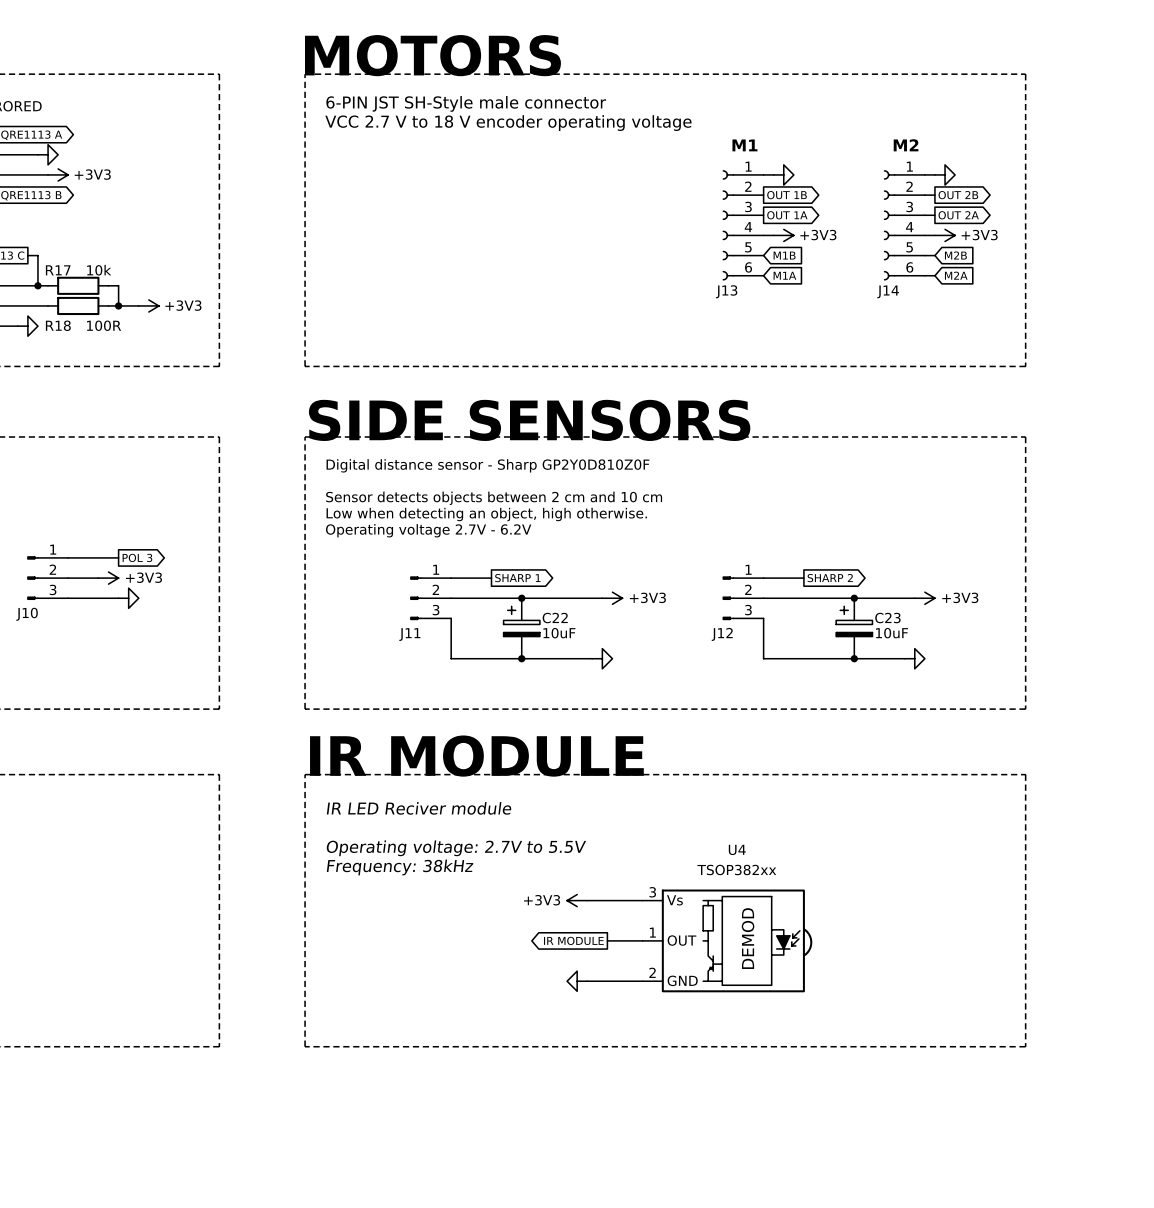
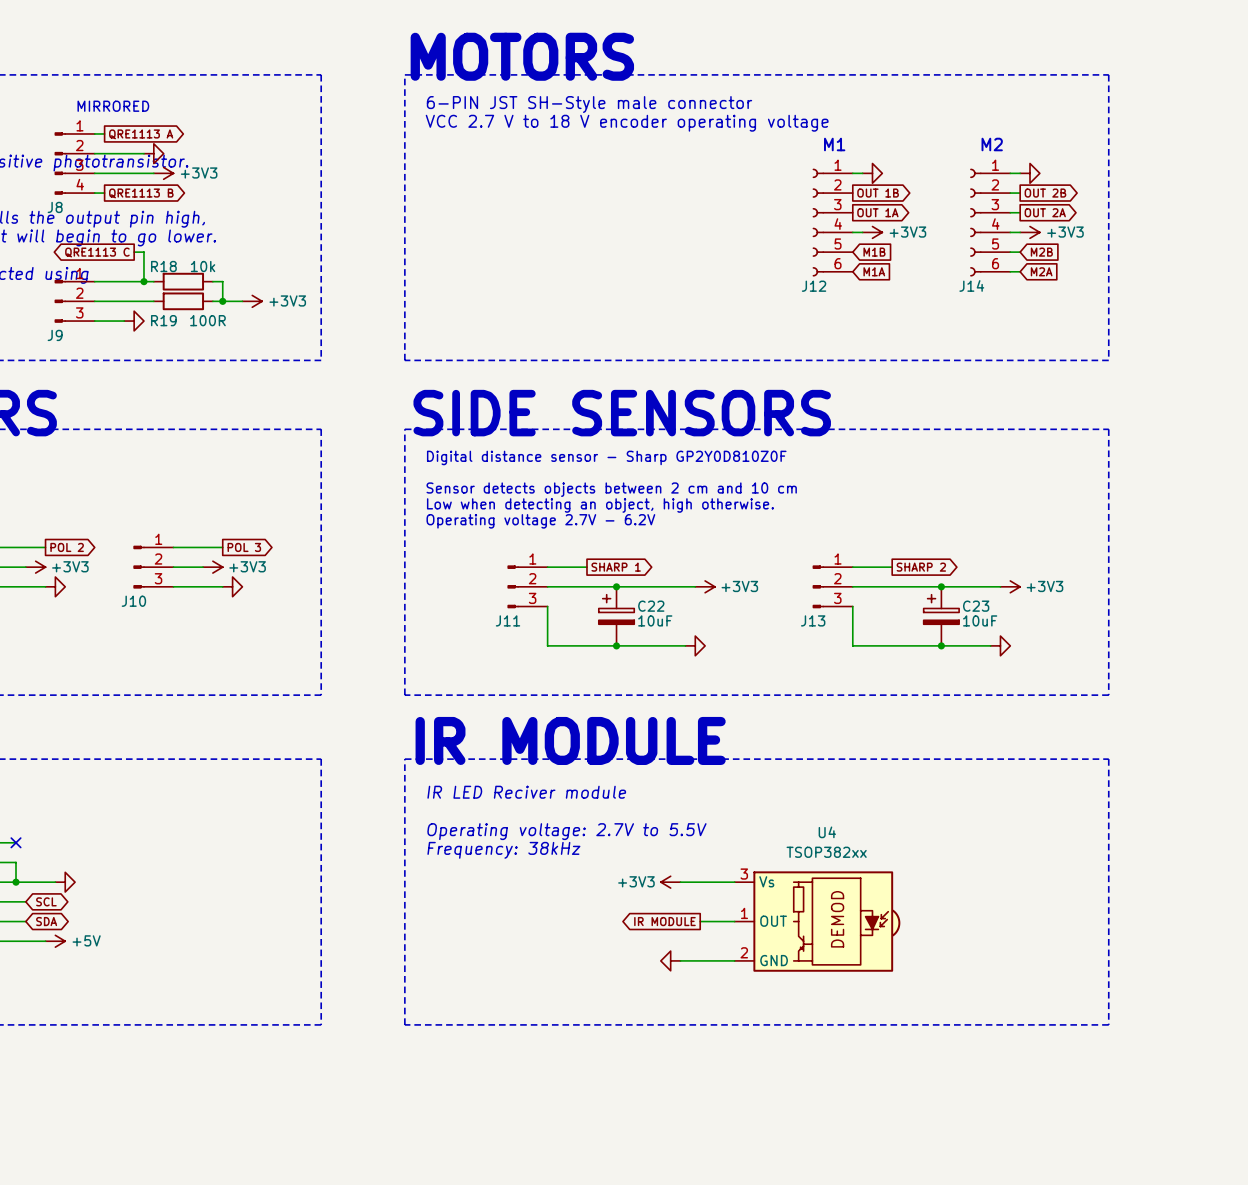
R17 name: R17 (58, 270) -> R18 (163, 266)
J13 name: J13 (726, 291) -> J12 (814, 286)
R18 name: R18 (58, 325) -> R19 (163, 320)
J12 name: J12 (722, 634) -> J13 (813, 620)

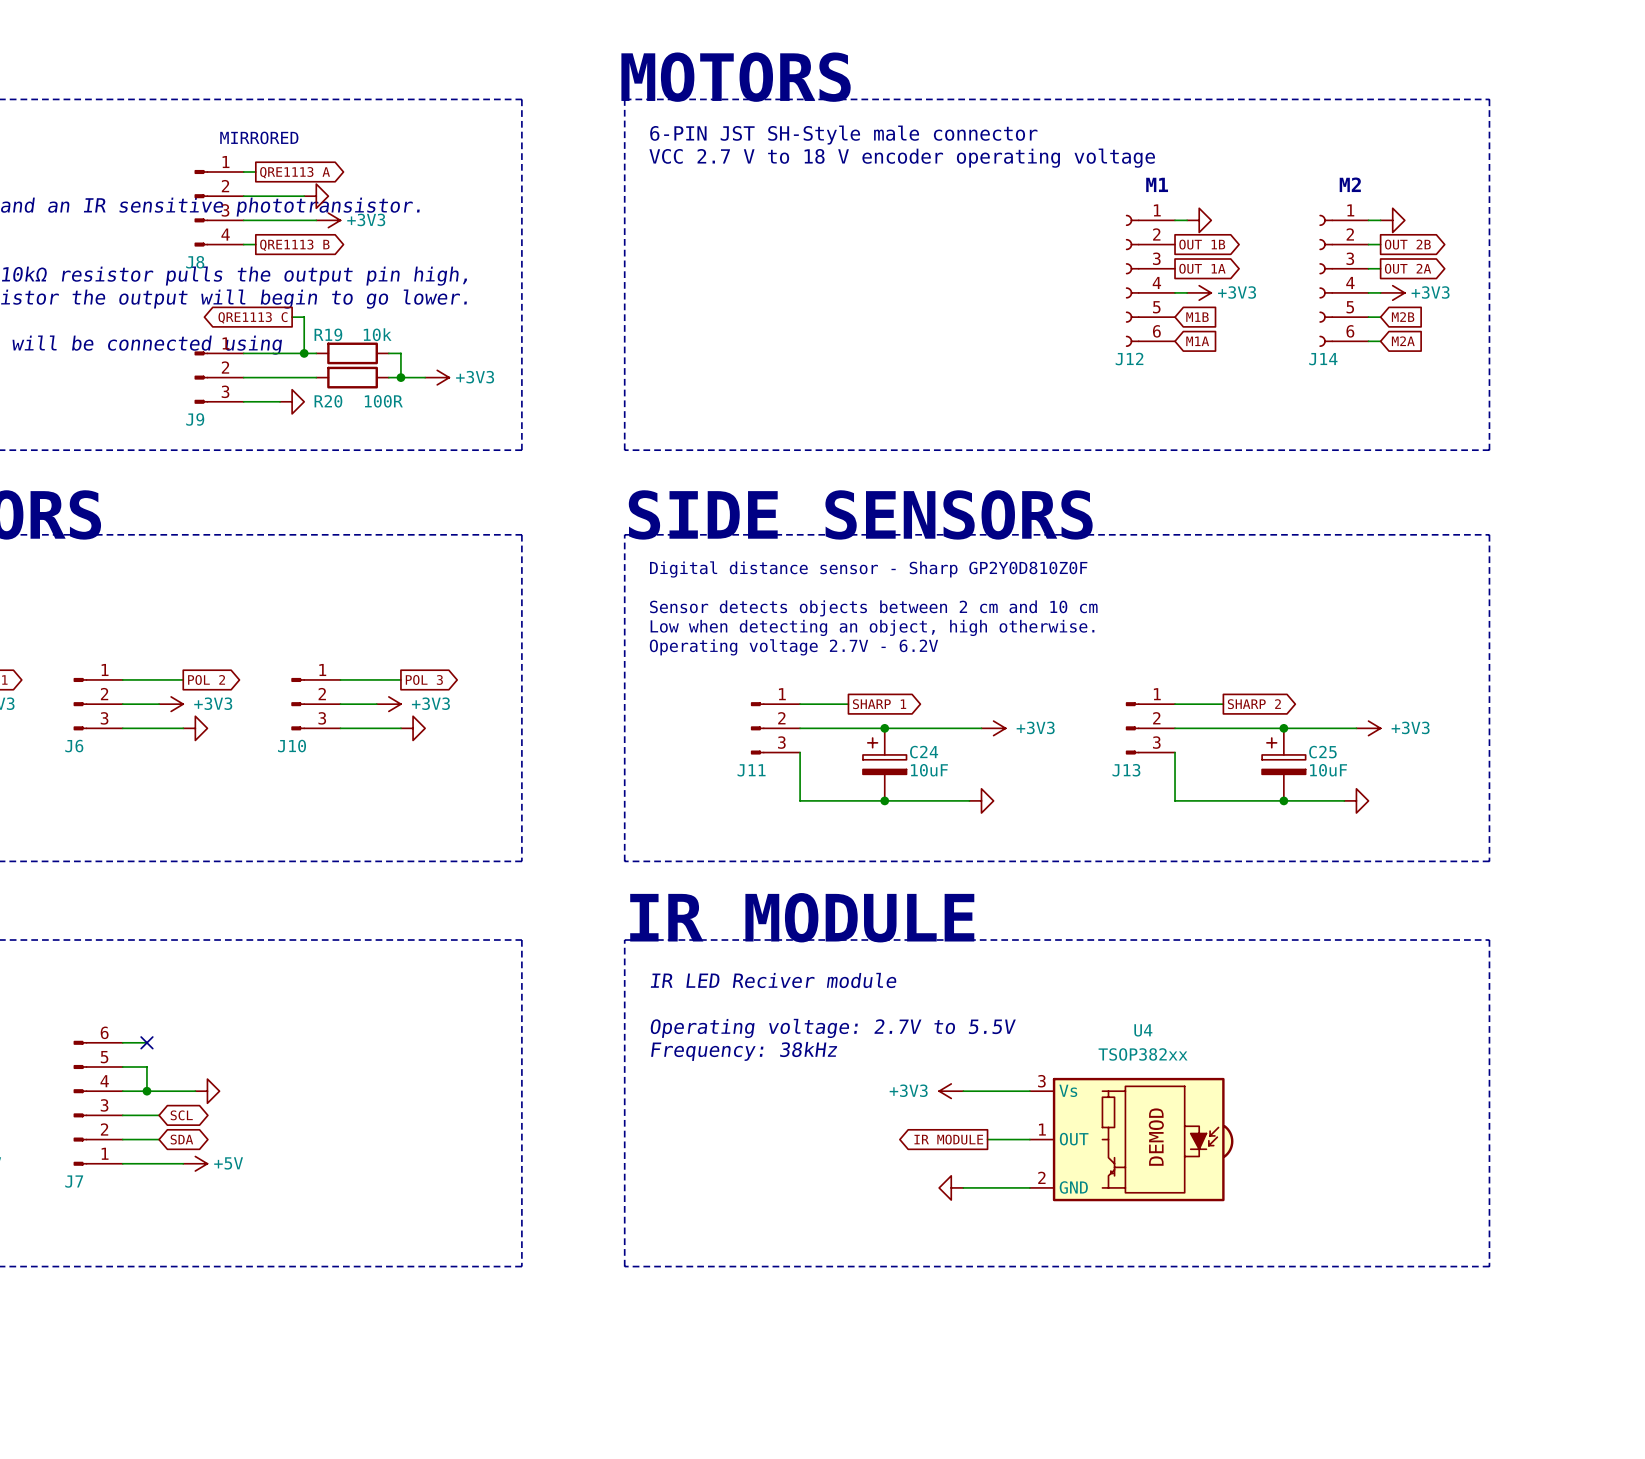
R18 name: R18 (163, 266) -> R19 (328, 334)
R19 name: R19 (163, 320) -> R20 (328, 401)
C22 name: C22 (651, 606) -> C24 (924, 752)
C23 name: C23 (976, 606) -> C25 (1322, 752)

